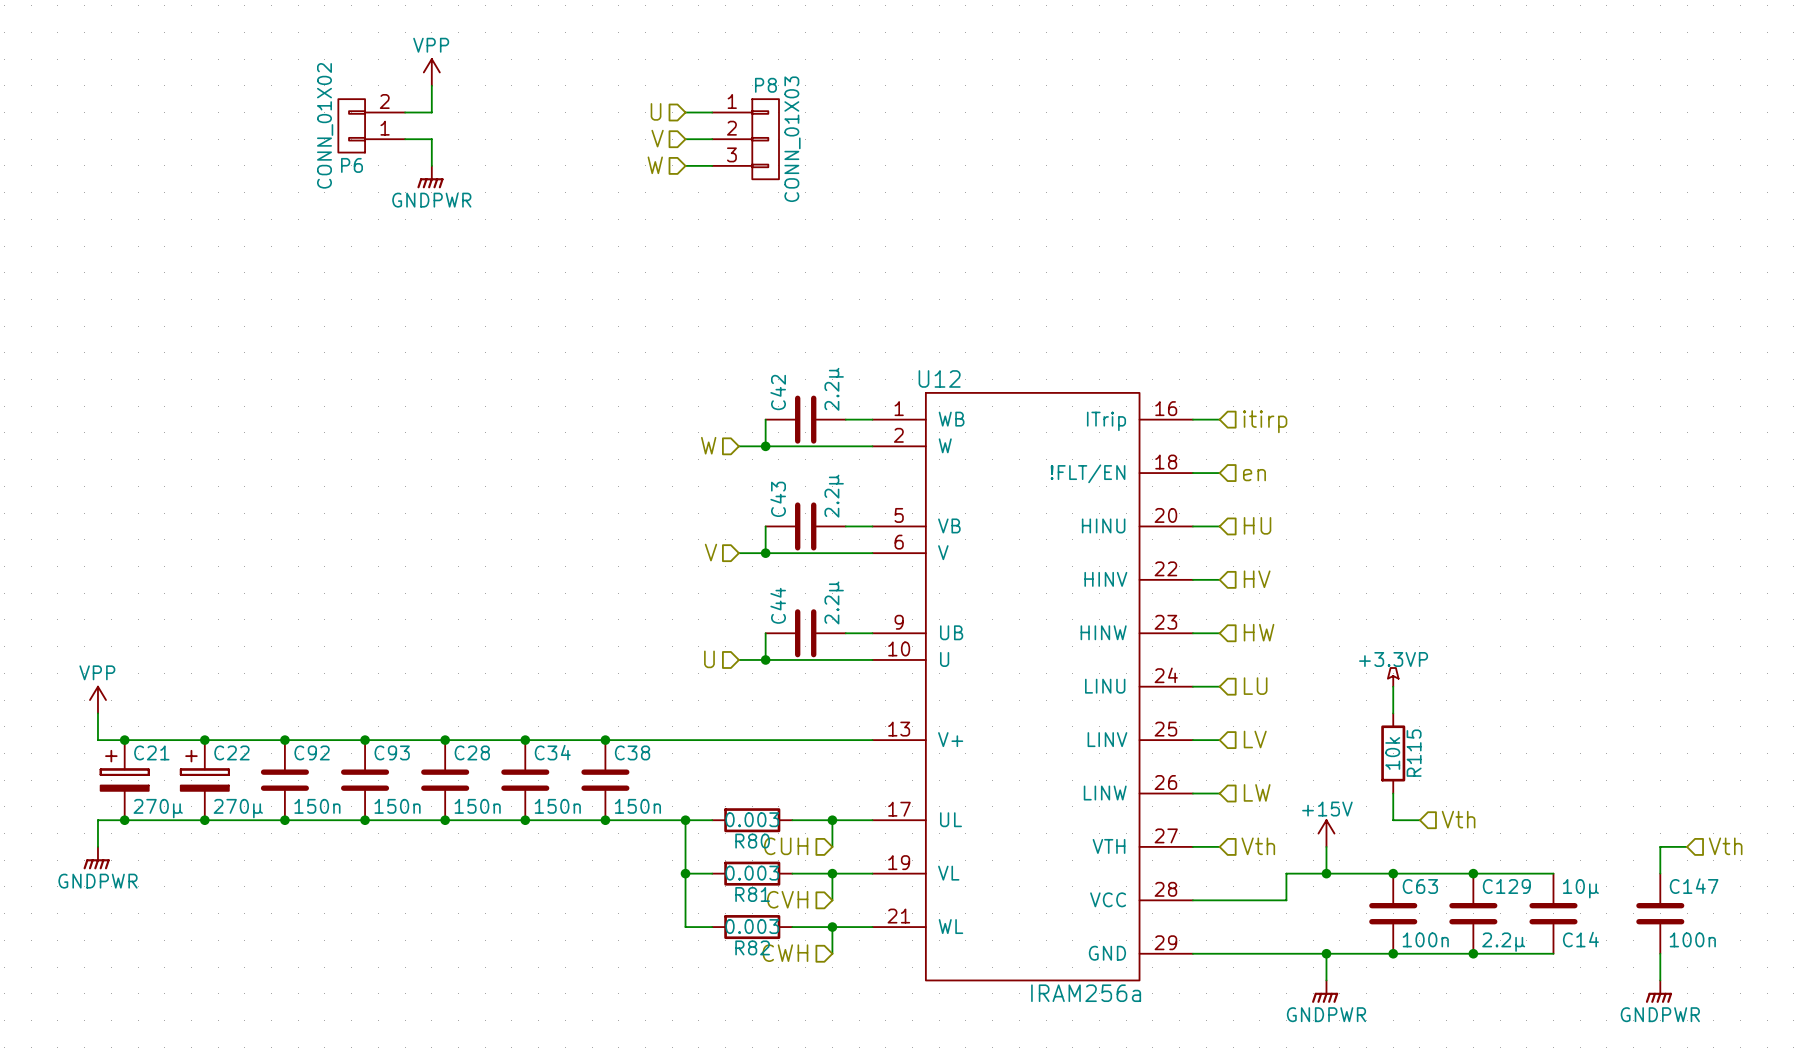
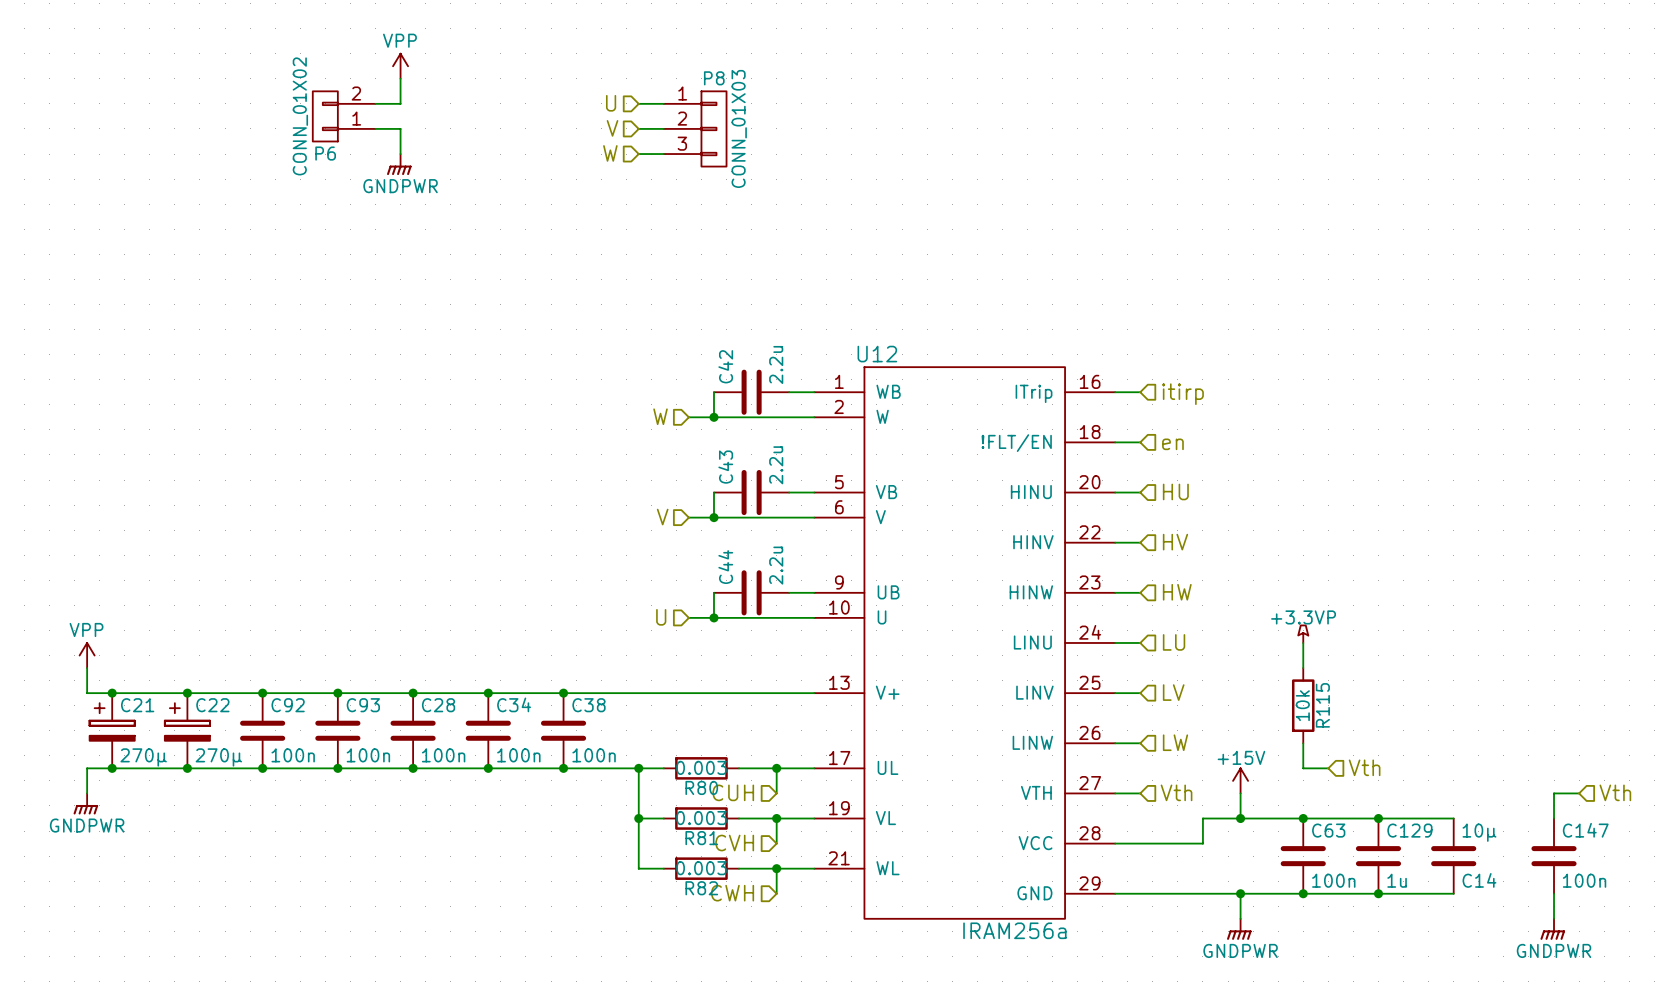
C42 value: 2.2µ (834, 389) -> 2.2u (776, 364)
C43 value: 2.2µ (834, 496) -> 2.2u (776, 465)
C44 value: 2.2µ (834, 602) -> 2.2u (776, 565)
C92 value: 150n (317, 806) -> 100n (293, 755)
C93 value: 150n (397, 806) -> 100n (368, 755)
C28 value: 150n (477, 806) -> 100n (443, 755)
C34 value: 150n (557, 806) -> 100n (518, 755)
C38 value: 150n (637, 806) -> 100n (594, 755)
C129 value: 2.2µ (1503, 942) -> 1u (1397, 880)

